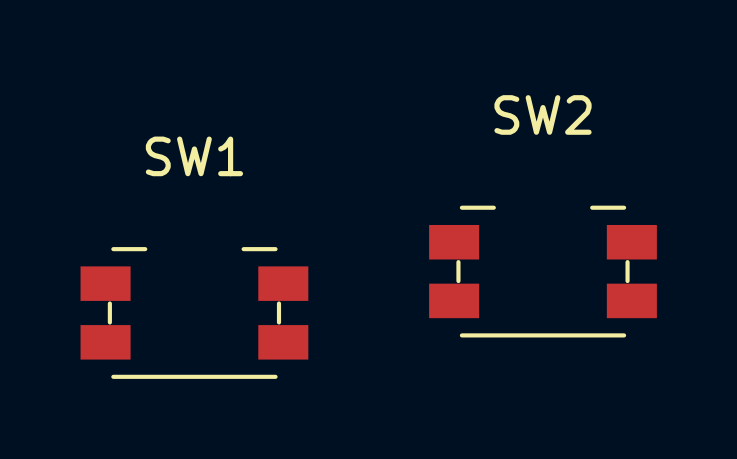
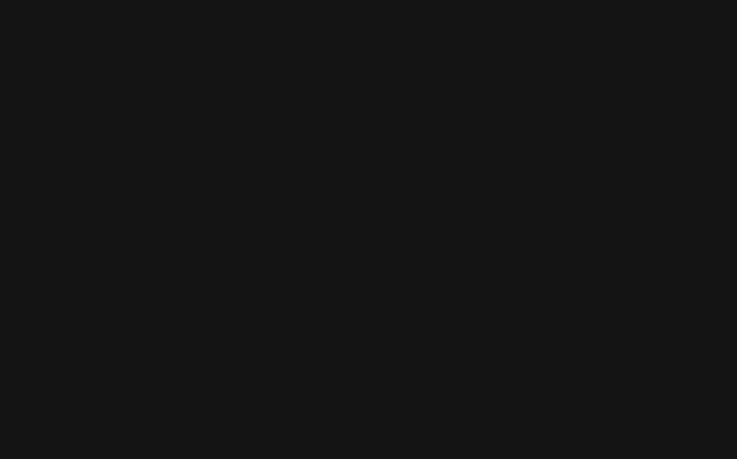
SW2: (543, 271) -> none
SW1: (194, 312) -> none

